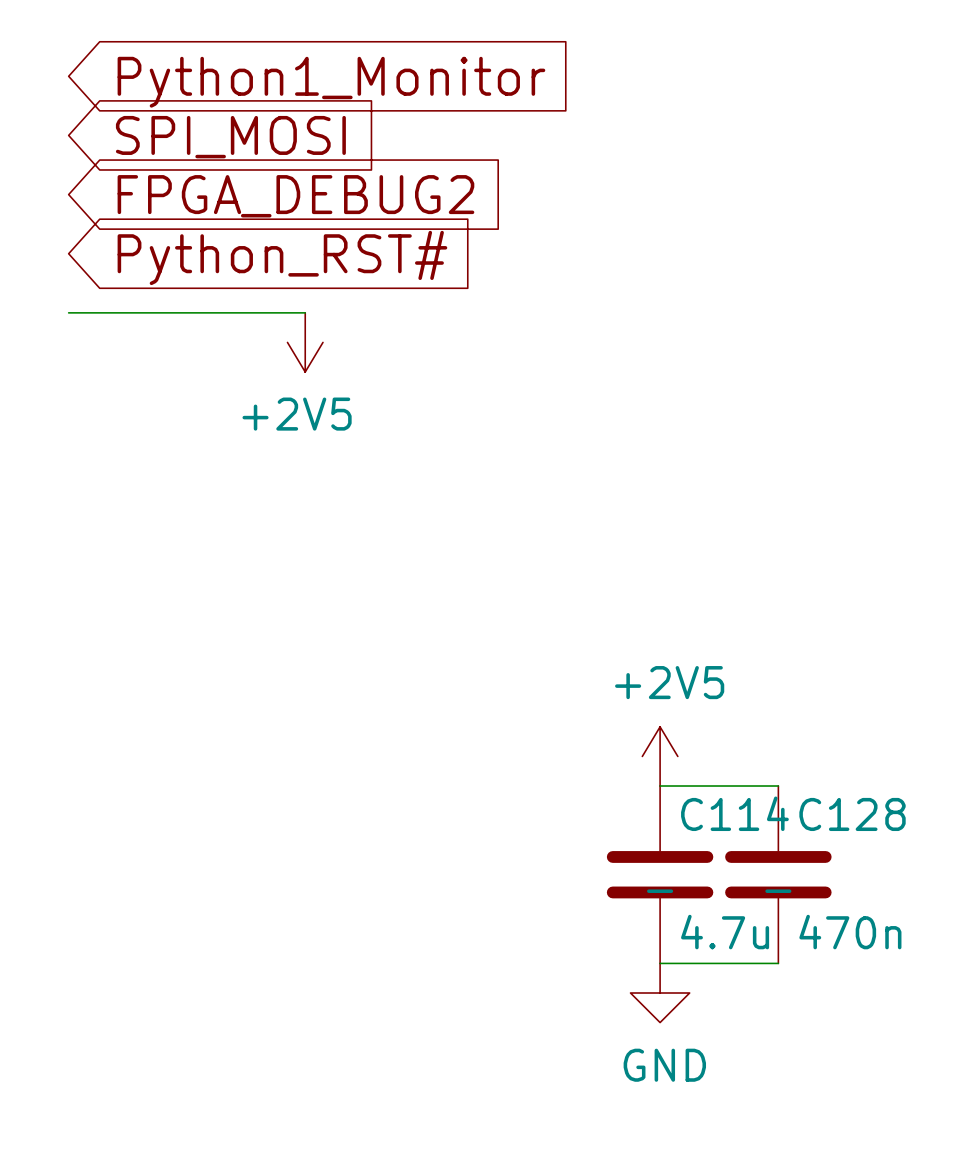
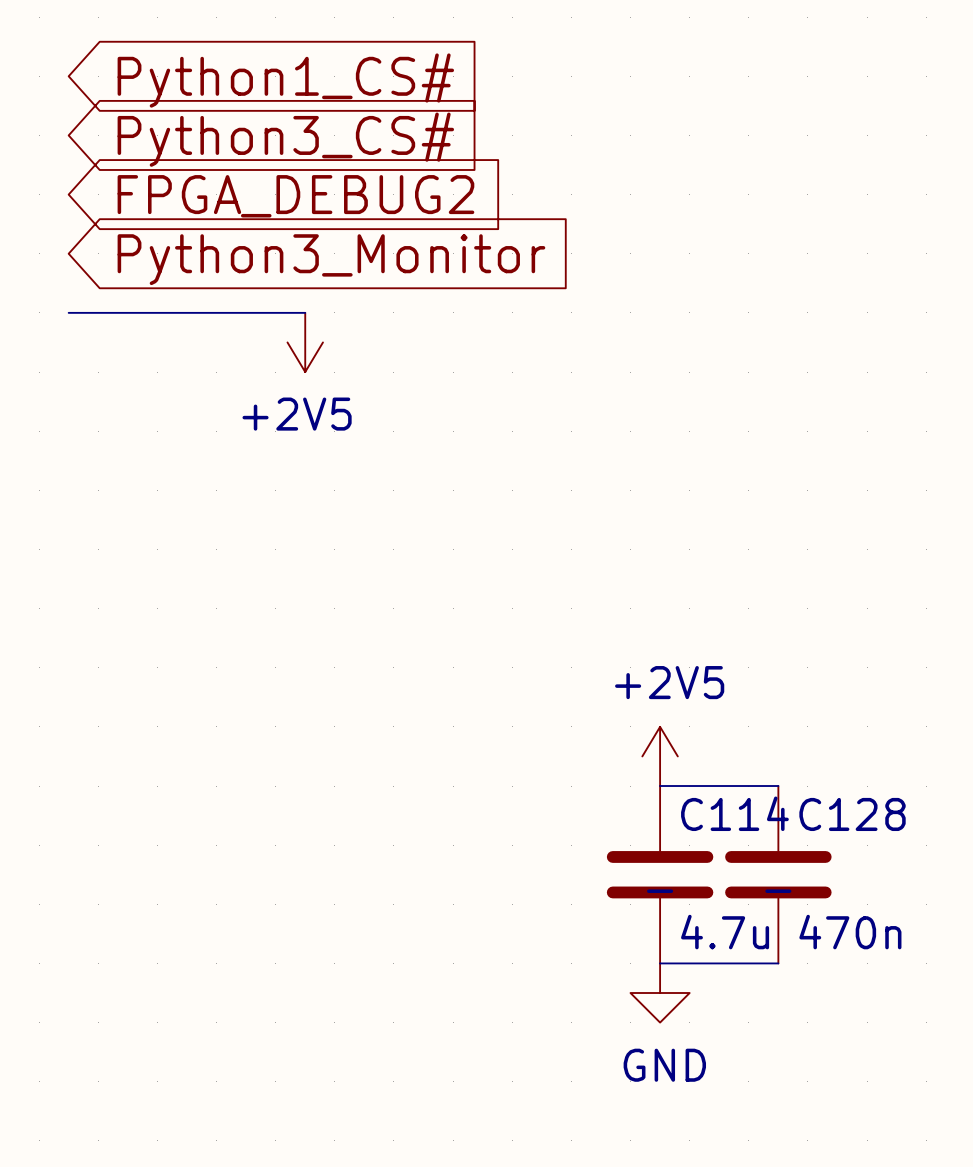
global label: Python1_Monitor (331, 82) -> Python1_CS# (285, 80)
global label: SPI_MOSI (230, 137) -> Python3_CS# (285, 139)
global label: Python_RST# (282, 257) -> Python3_Monitor (331, 259)

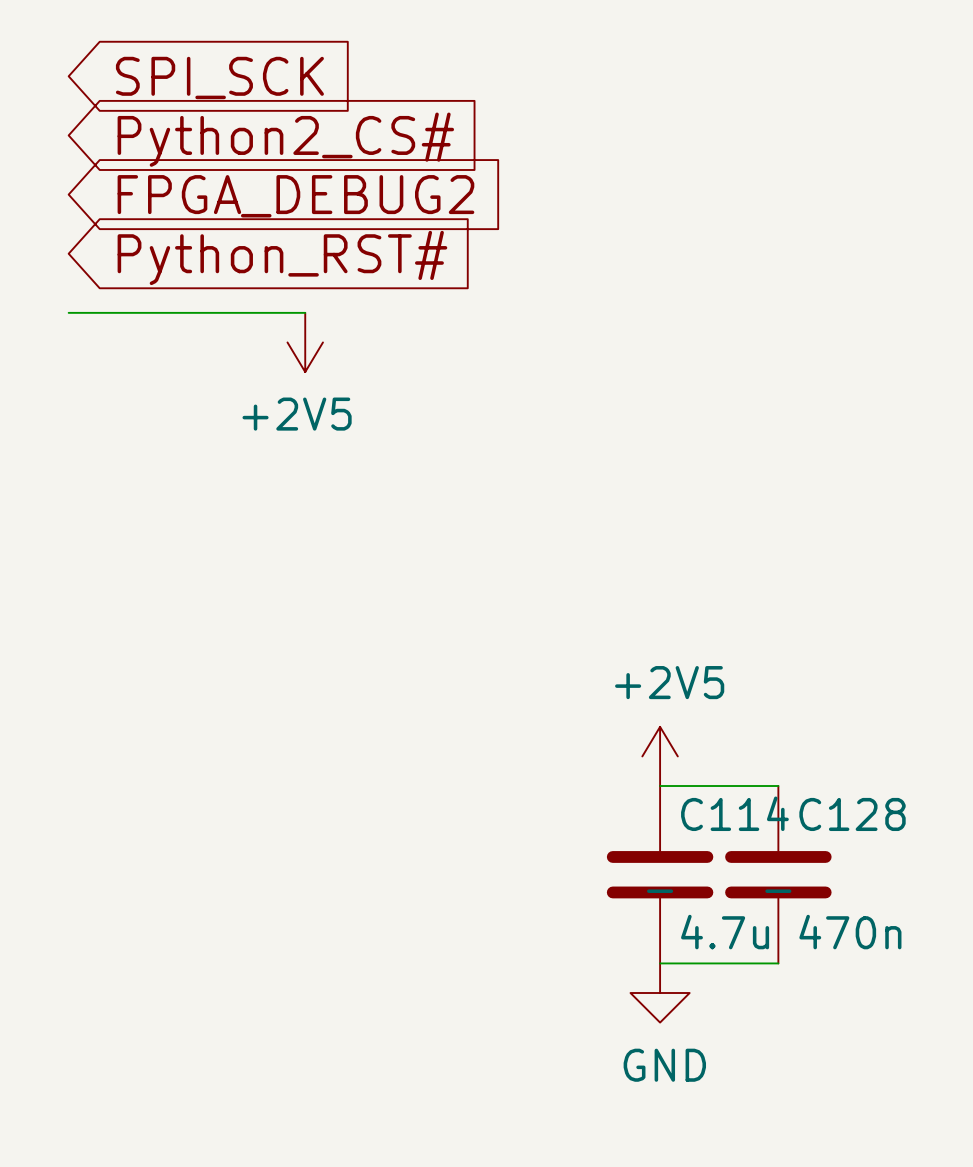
global label: Python1_CS# (285, 80) -> SPI_SCK (219, 77)
global label: Python3_CS# (285, 139) -> Python2_CS# (285, 139)
global label: Python3_Monitor (331, 259) -> Python_RST# (282, 257)

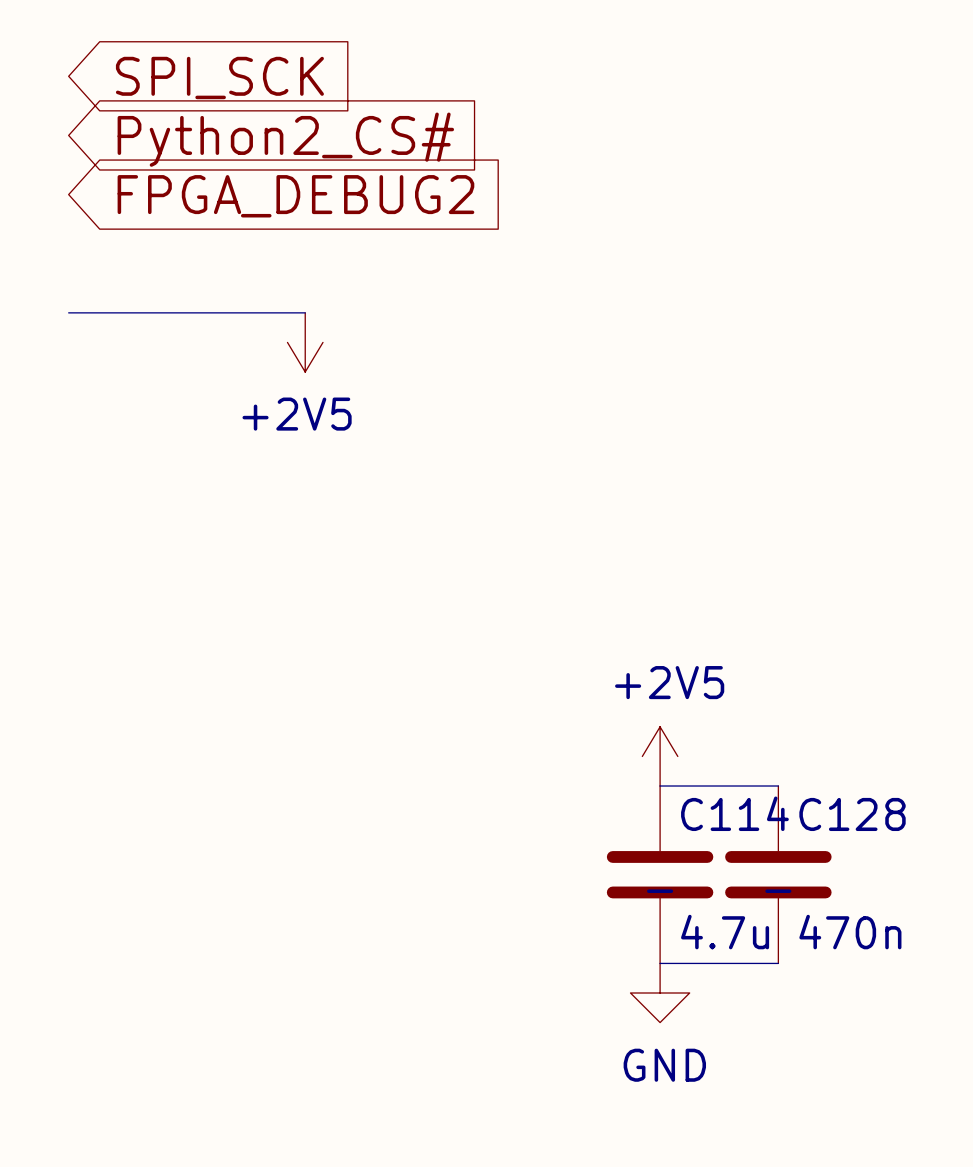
global label: Python_RST# (282, 257) -> none

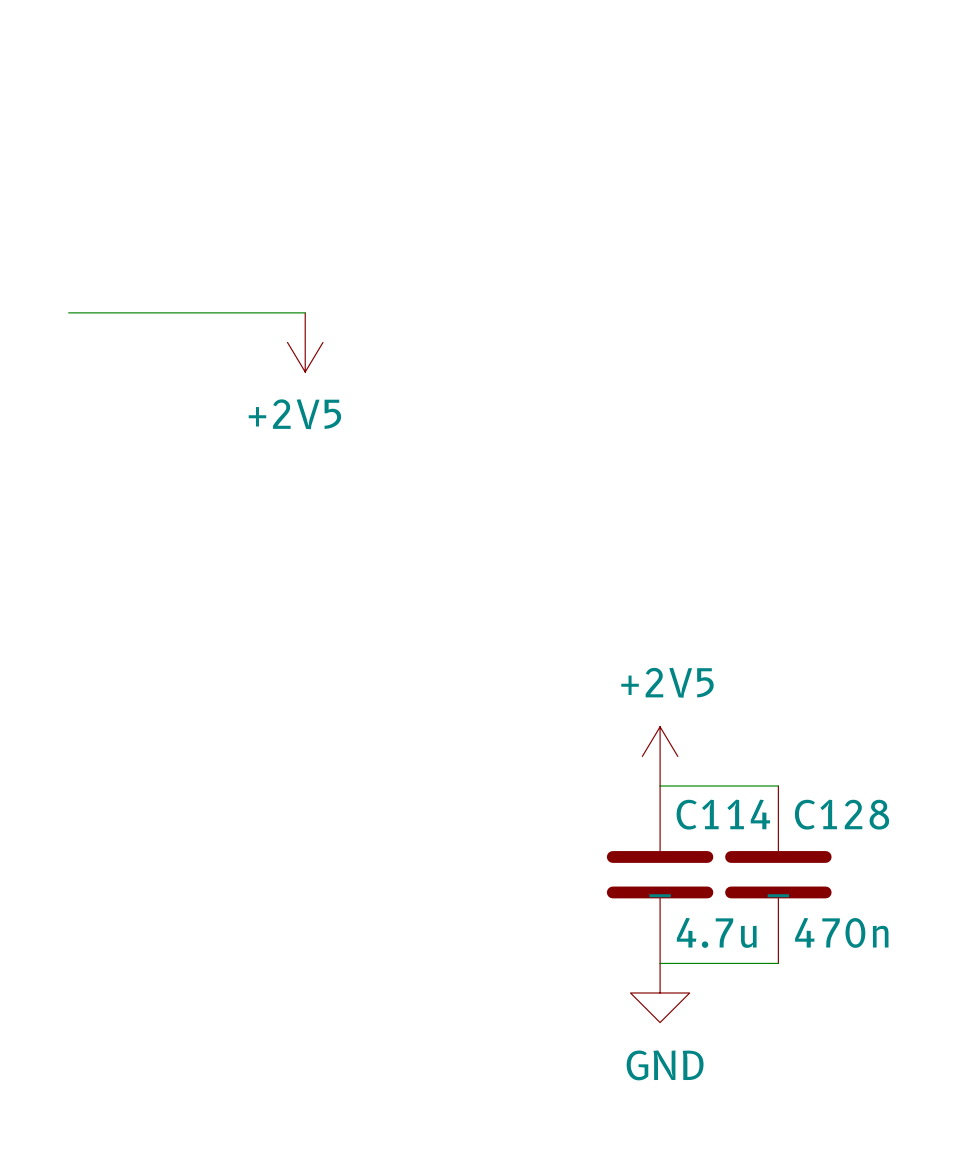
global label: SPI_SCK (219, 77) -> none
global label: Python2_CS# (285, 139) -> none
global label: FPGA_DEBUG2 (295, 196) -> none

